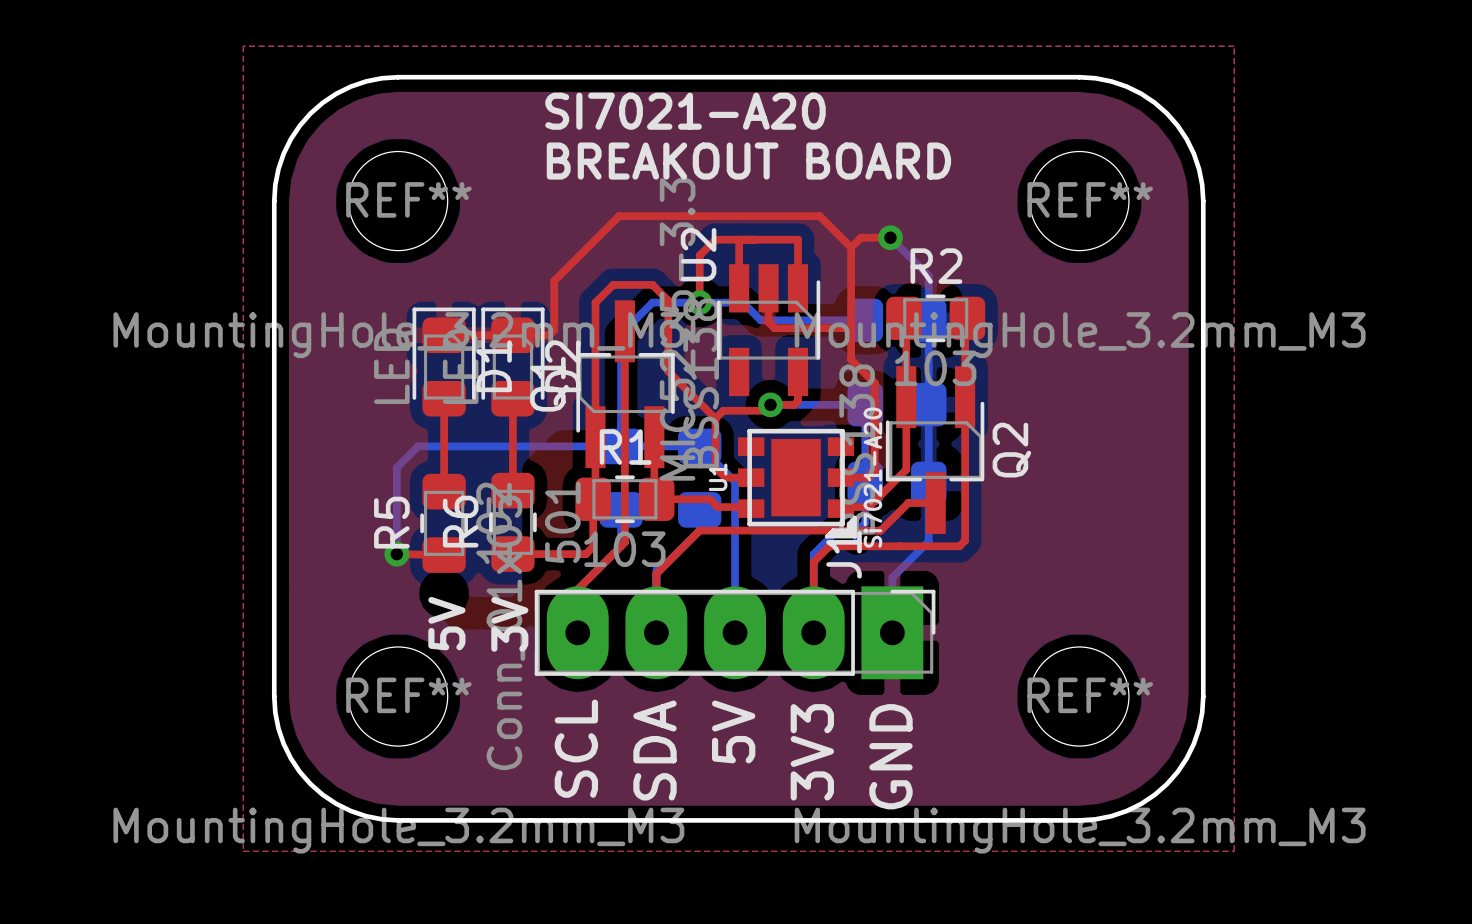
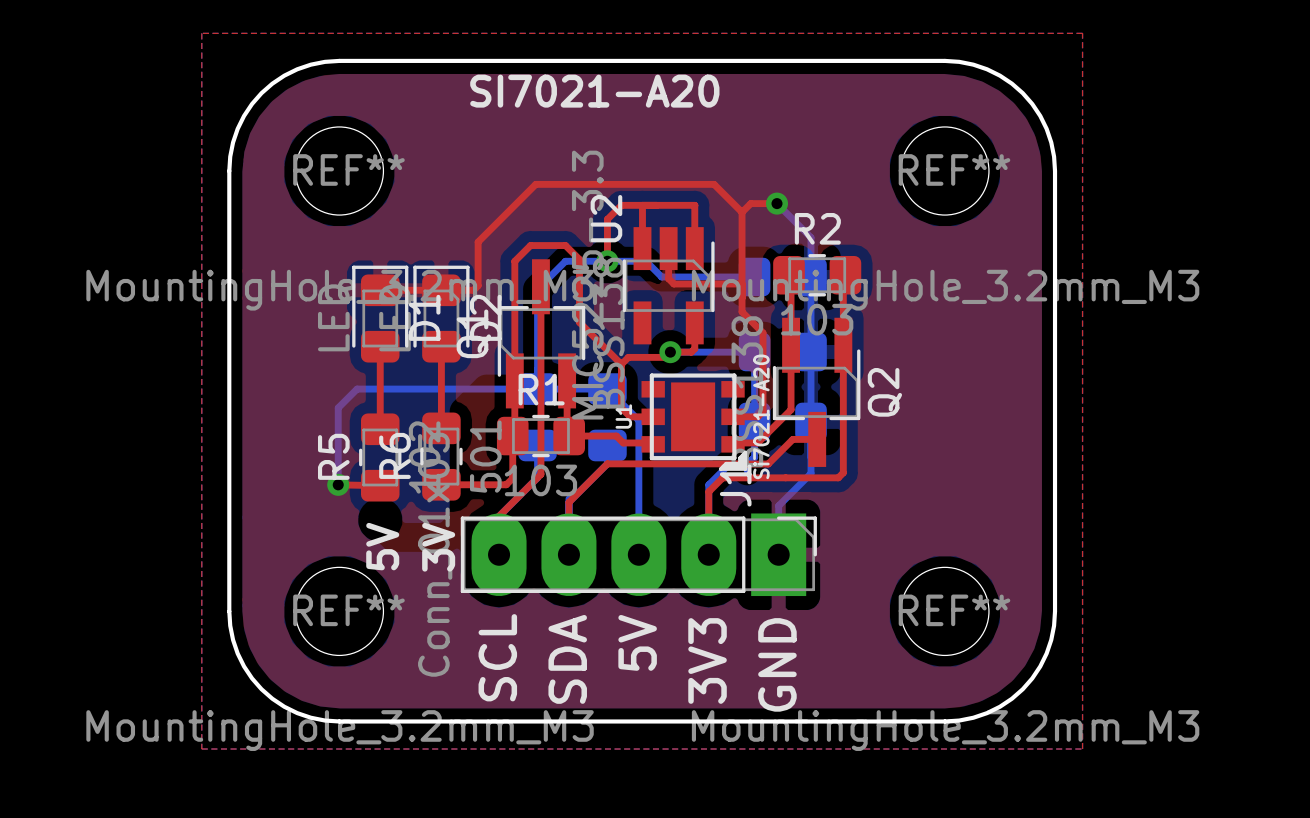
text: BREAKOUT BOARD (748, 161) -> none

